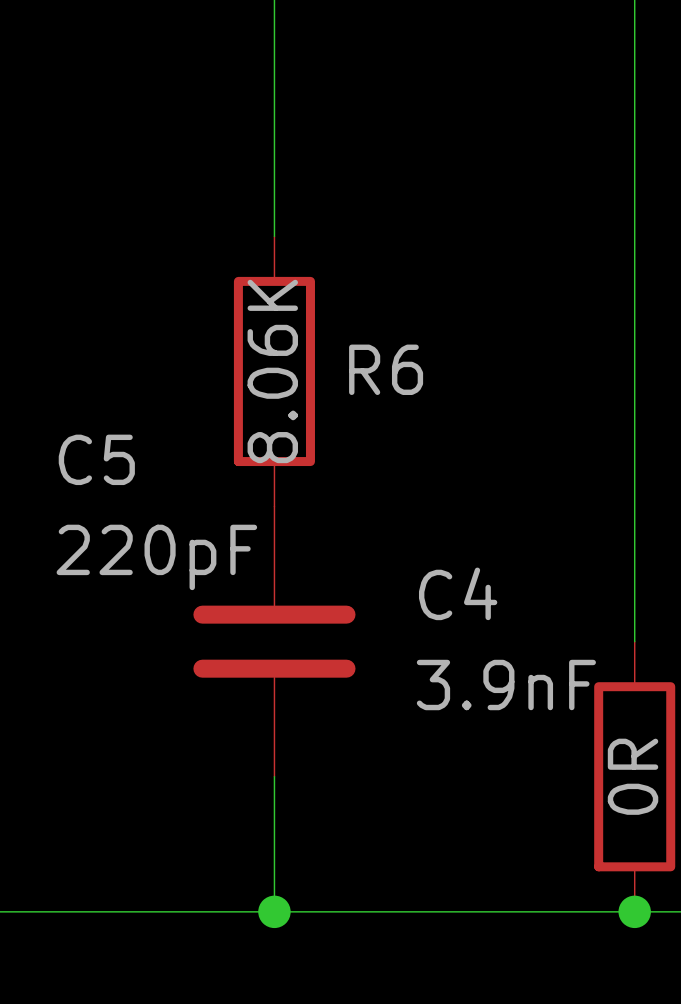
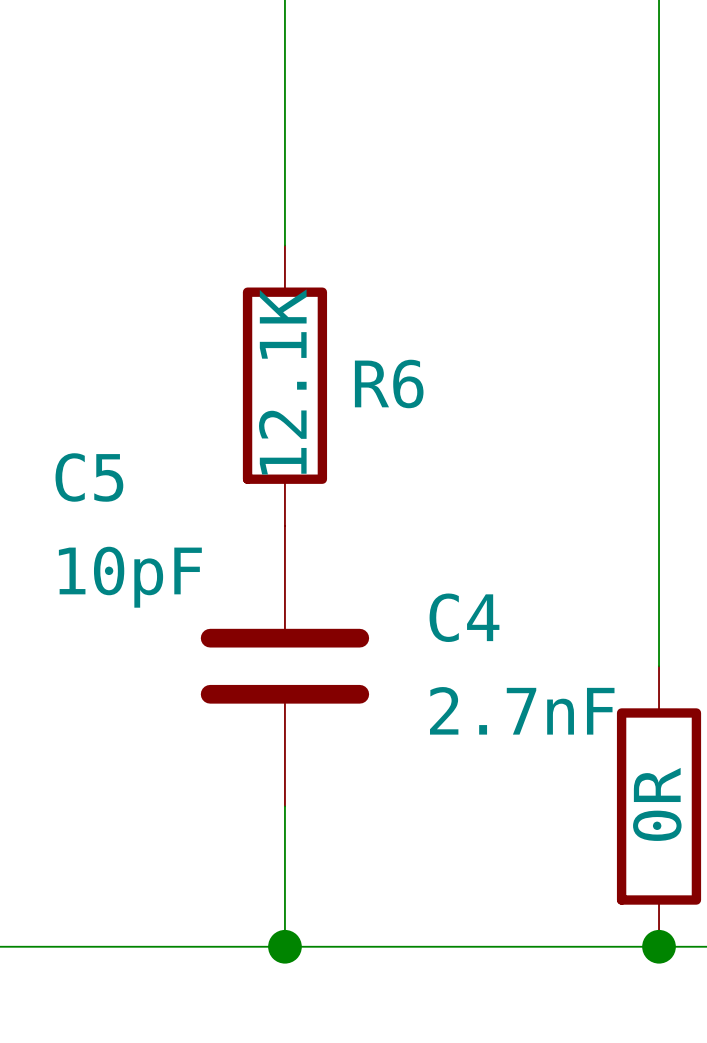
R6 value: 8.06K (272, 371) -> 12.1K (282, 381)
C5 value: 220pF (156, 557) -> 10pF (130, 577)
C4 value: 3.9nF (506, 685) -> 2.7nF (522, 710)

